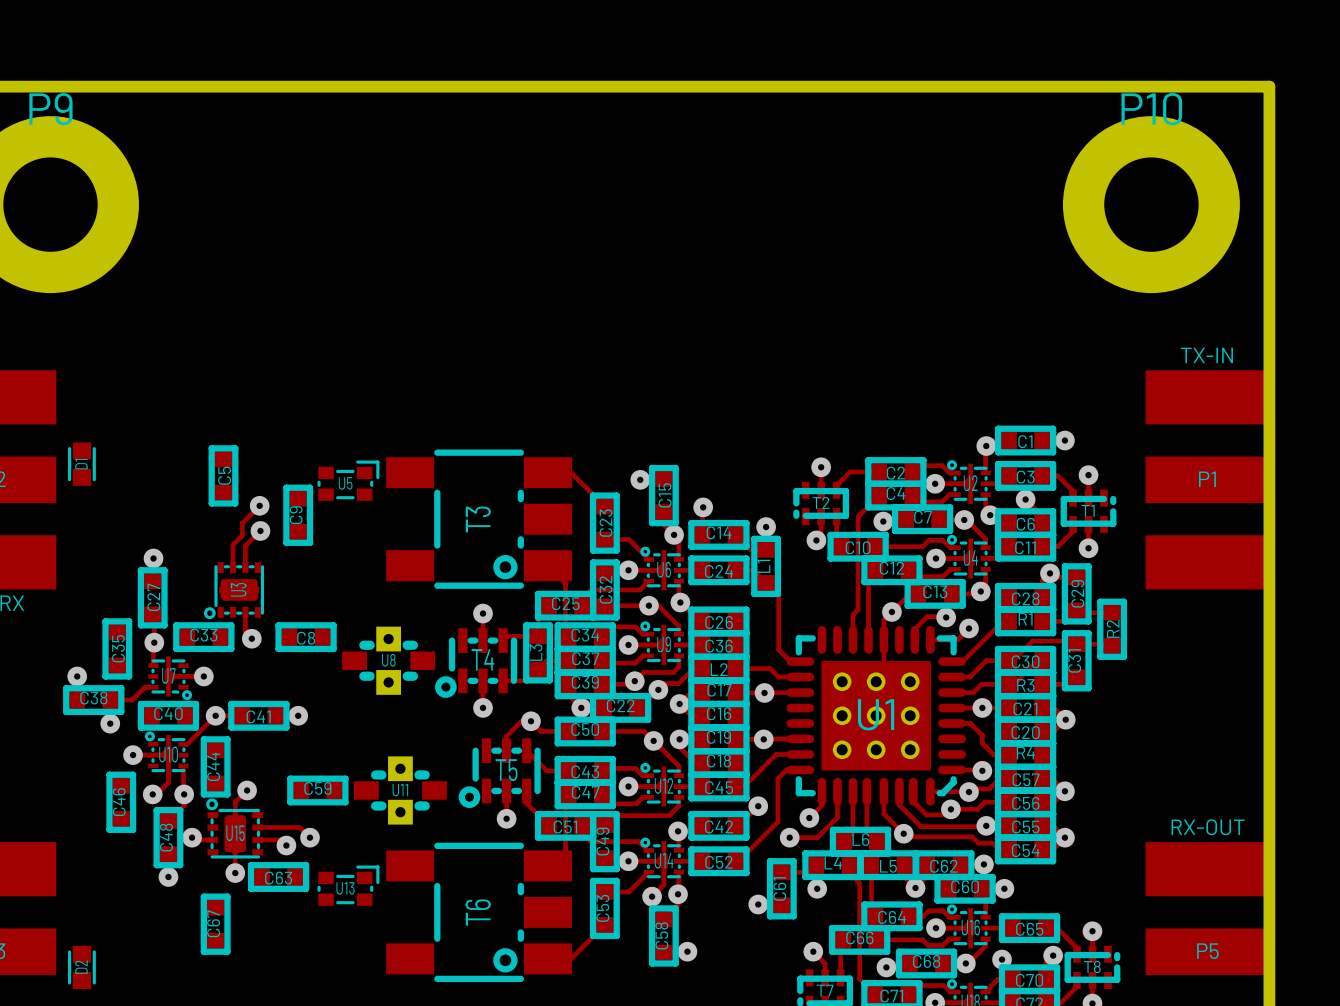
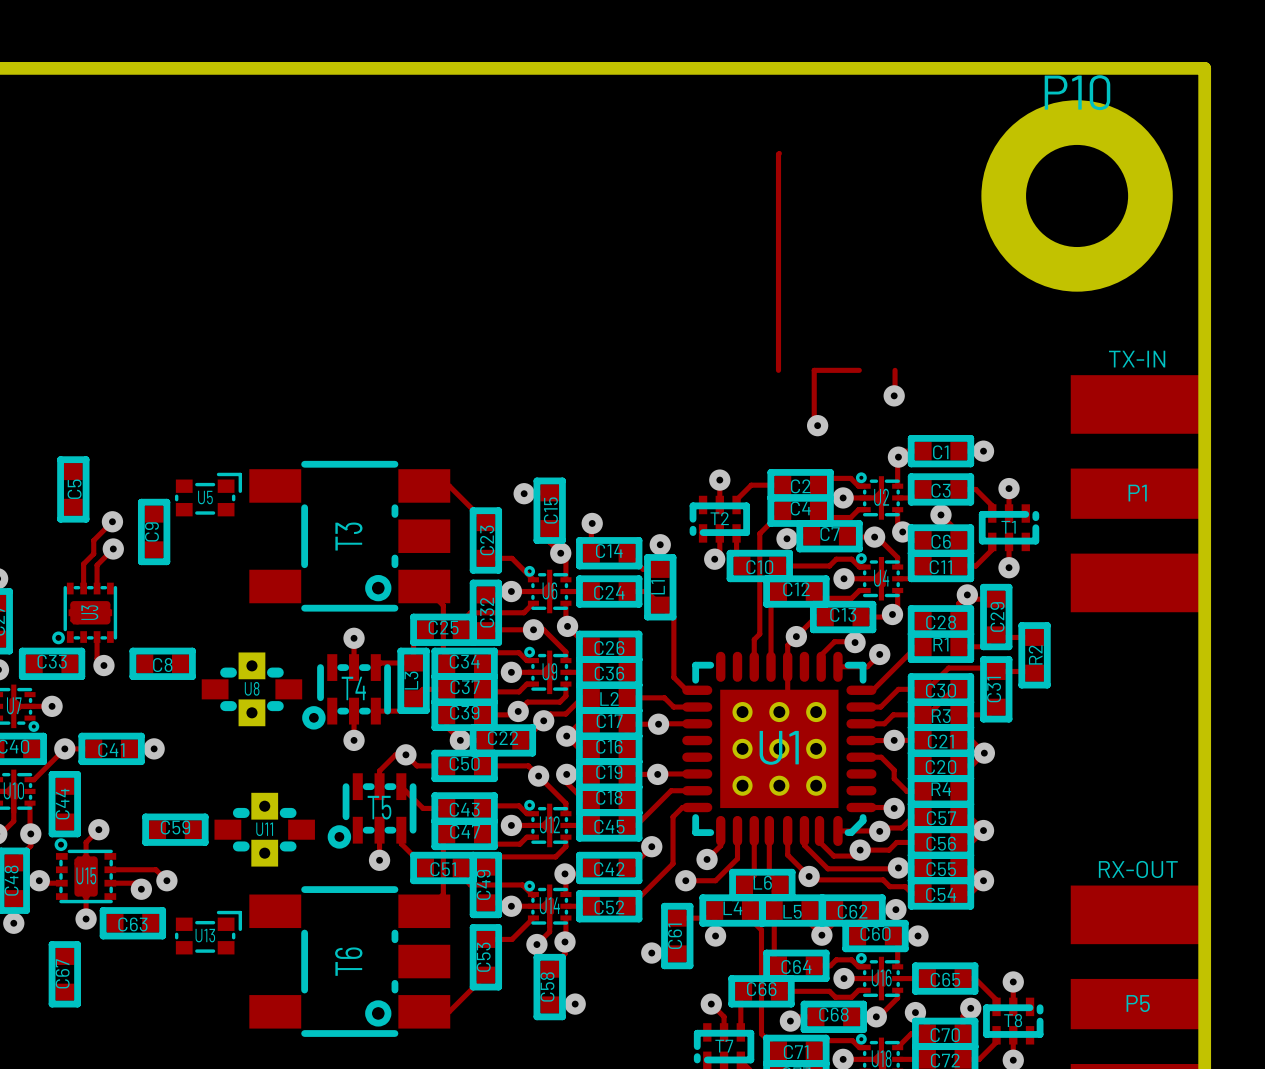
track: none -> (779, 153) (778, 370)
track: none -> (859, 370) (814, 370) (814, 422) (817, 425)
track: none -> (895, 370) (894, 395)
via: none -> (894, 395)
via: none -> (817, 425)

